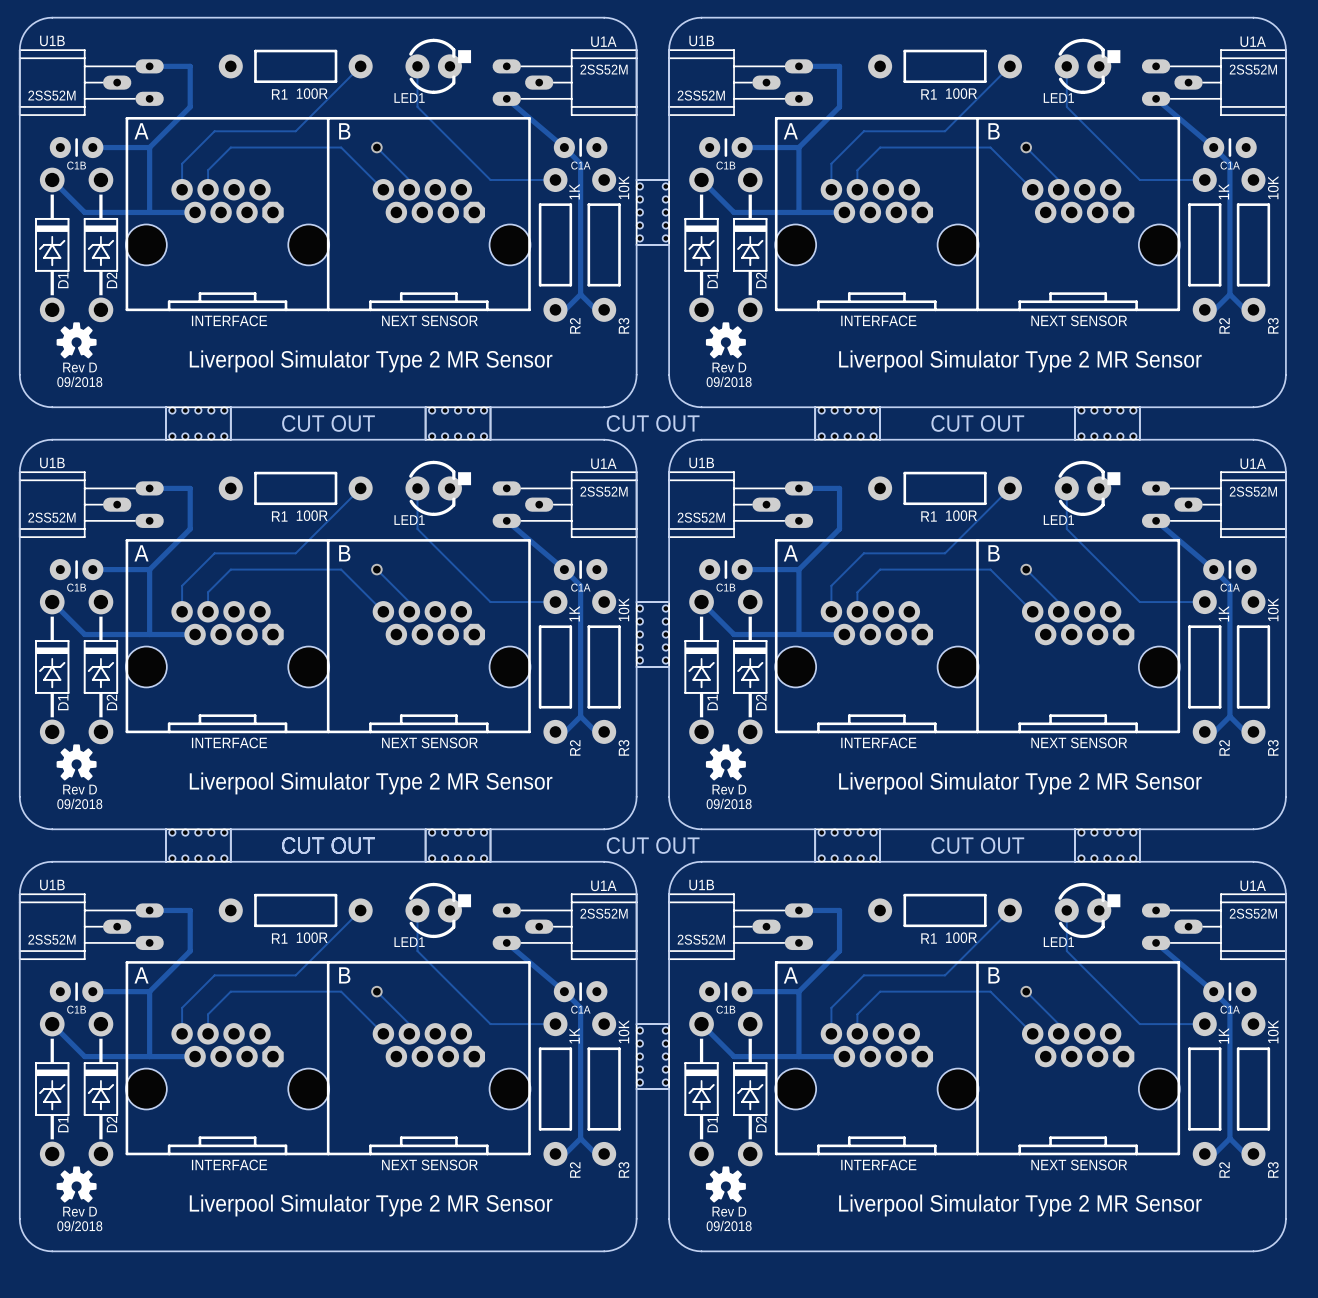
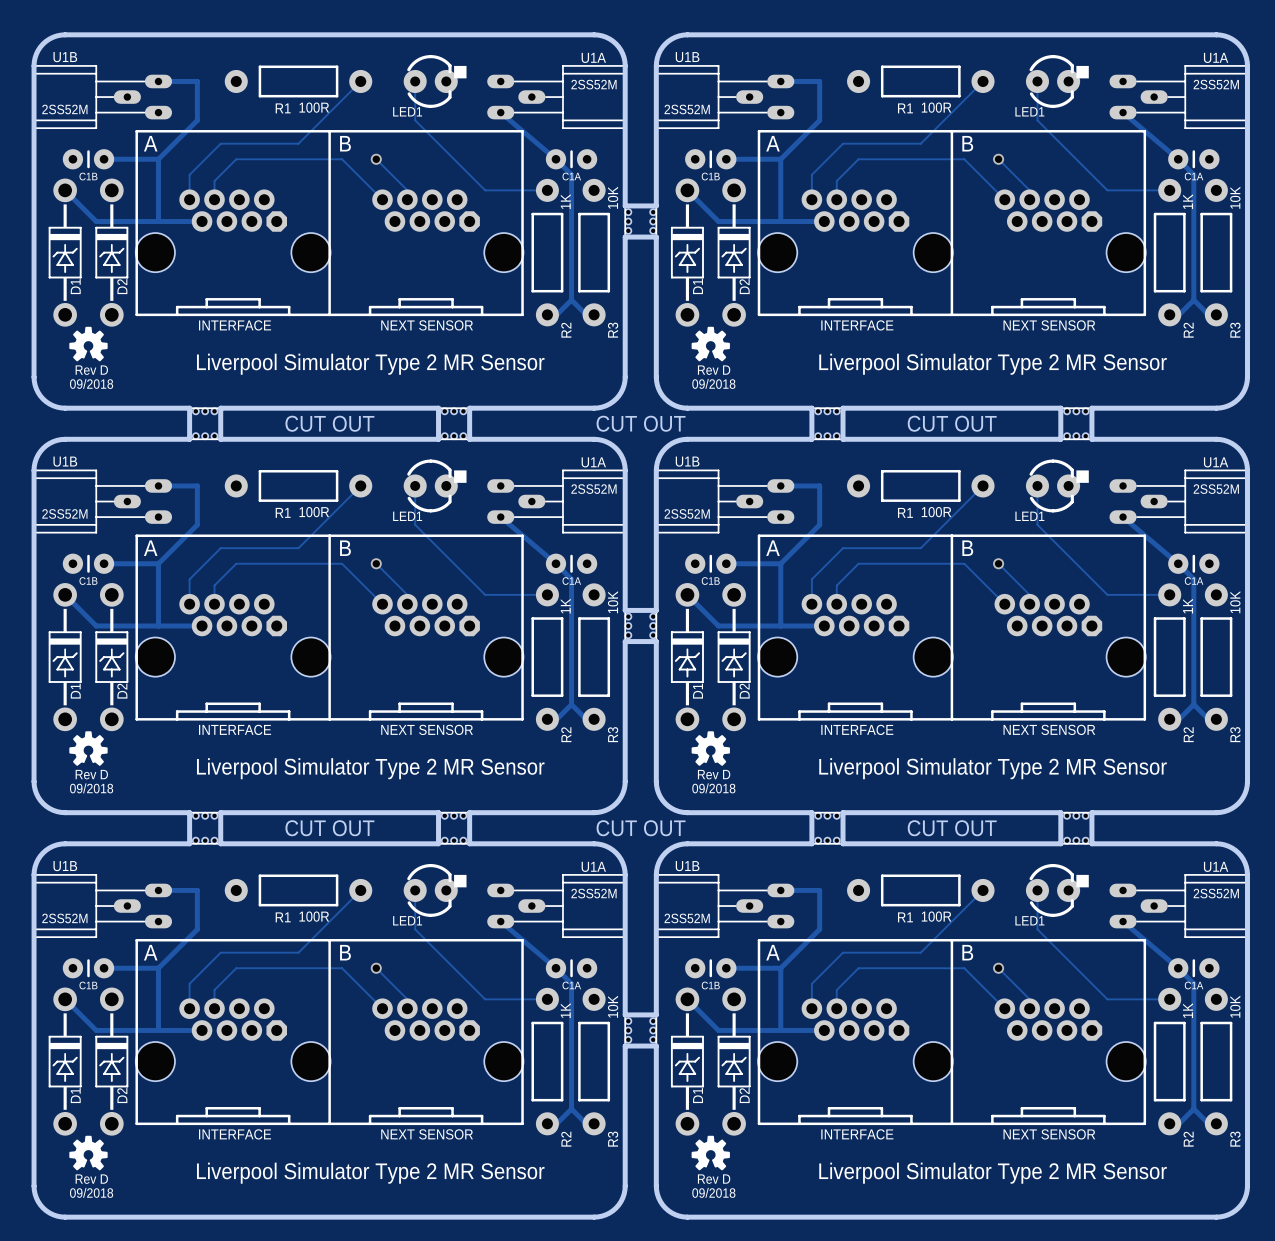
part footprint: [18, 16, 1287, 1253] -> [625, 610, 657, 642]
board edge: none -> (65, 34) (602, 35) (616, 43) (622, 54) (624, 61) (625, 205) (656, 205) (656, 61) (658, 54) (665, 43) (679, 35) (1216, 34) (1228, 37) (1238, 43) (1245, 54) (1247, 65) (1247, 377) (1245, 388) (1235, 401) (1220, 407) (1091, 408) (1091, 439) (1220, 439) (1228, 441) (1238, 448) (1245, 458) (1247, 466) (1247, 781) (1245, 793) (1235, 806) (1220, 812) (1091, 812) (1091, 843) (1220, 844) (1235, 850) (1245, 862) (1247, 874) (1247, 1186) (1245, 1197) (1238, 1208) (1228, 1214) (1216, 1217) (679, 1216) (665, 1208) (658, 1197) (656, 1190) (656, 1046) (625, 1046) (624, 1190) (622, 1197) (616, 1208) (602, 1216) (65, 1217) (53, 1214) (43, 1208) (36, 1197) (34, 1186) (34, 874) (36, 862) (46, 850) (61, 844) (189, 843) (189, 812) (61, 812) (53, 810) (43, 803) (36, 793) (34, 785) (34, 470) (36, 458) (46, 445) (61, 439) (189, 439) (189, 408) (61, 407) (53, 405) (43, 399) (35, 385) (34, 61) (36, 54) (43, 43) (53, 37) (65, 34)
part: none -> (640, 221)
board edge: none -> (625, 237) (625, 377) (624, 385) (618, 396) (609, 404) (598, 407) (469, 408) (469, 439) (594, 439) (606, 441) (616, 448) (622, 458) (625, 470) (625, 610) (656, 610) (656, 470) (657, 462) (662, 451) (671, 443) (683, 439) (811, 439) (811, 408) (687, 408) (675, 405) (665, 399) (658, 388) (656, 377) (656, 237) (625, 237)
board edge: none -> (220, 408) (220, 439) (438, 439) (438, 408) (220, 408)
board edge: none -> (843, 408) (843, 439) (1060, 439) (1060, 408) (843, 408)
part: none -> (205, 423)
part: none -> (454, 423)
part: none -> (827, 423)
part: none -> (1076, 423)
board edge: none -> (625, 641) (625, 781) (624, 789) (618, 800) (609, 808) (598, 812) (469, 812) (469, 843) (594, 843) (606, 846) (616, 852) (622, 862) (625, 874) (625, 1014) (656, 1014) (656, 874) (657, 866) (662, 855) (671, 847) (683, 844) (811, 843) (811, 812) (687, 812) (675, 810) (665, 803) (658, 793) (656, 781) (656, 641) (625, 641)
board edge: none -> (220, 812) (438, 812) (438, 843) (220, 843) (220, 812)
board edge: none -> (843, 812) (1060, 812) (1060, 843) (843, 843) (843, 812)
part: none -> (205, 828)
part: none -> (454, 828)
part: none -> (827, 828)
part: none -> (1076, 828)
part: none -> (640, 1030)

